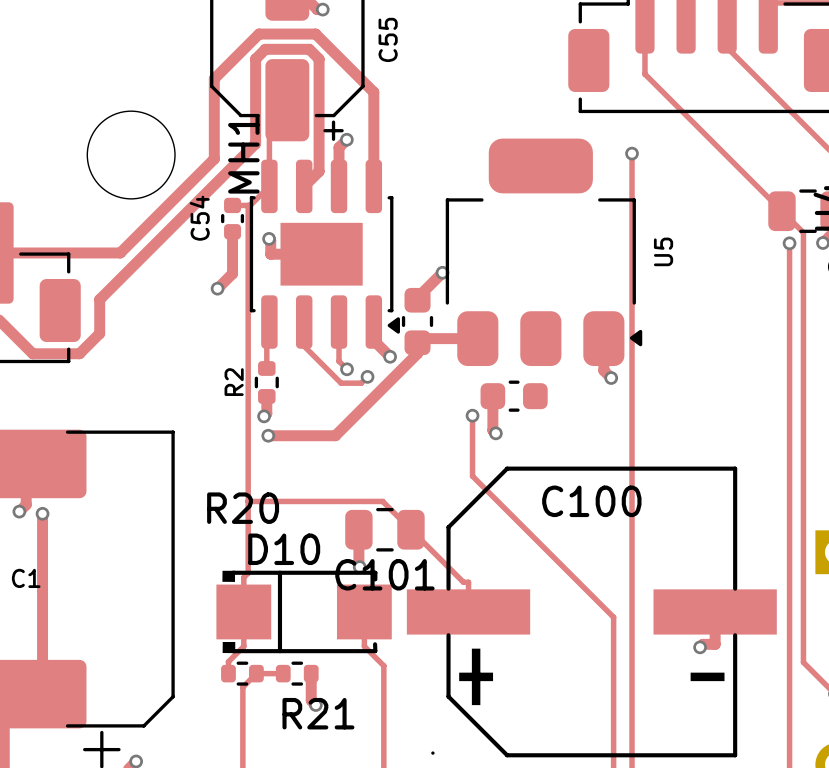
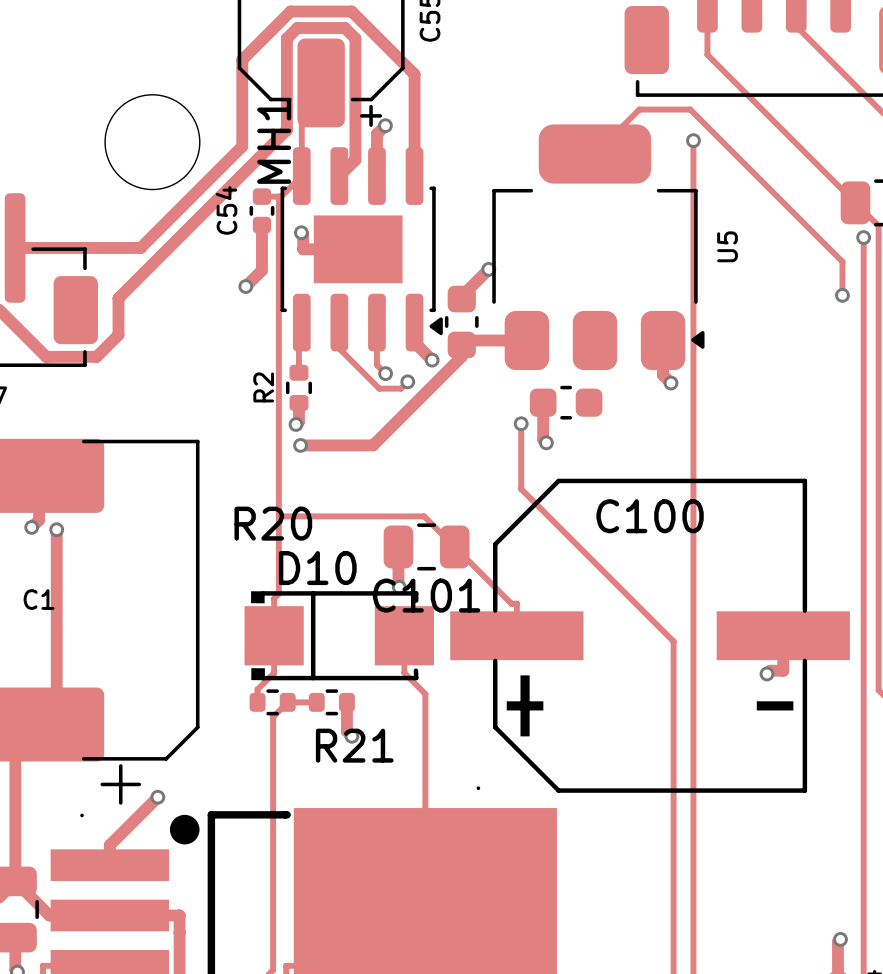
track: none -> (594, 154) (639, 109) (690, 109) (842, 261) (842, 295)
via: none -> (842, 295)

